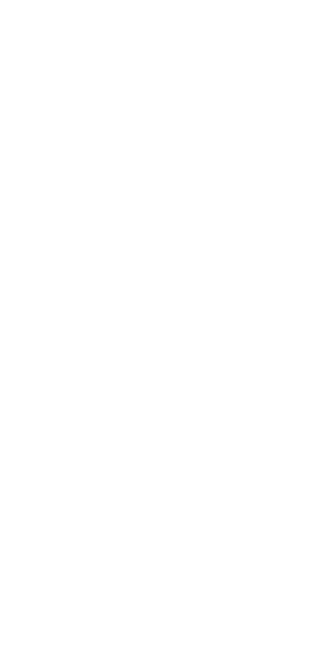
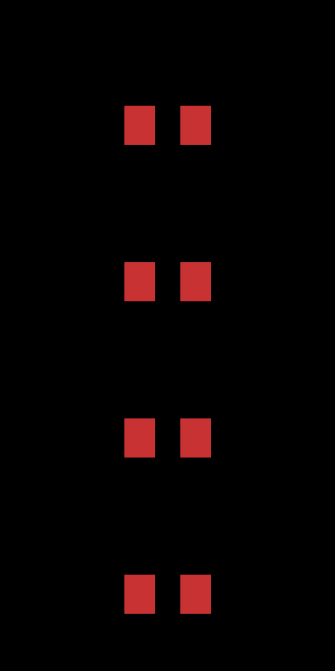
part: none -> (167, 125)
part: none -> (167, 281)
part: none -> (167, 437)
part: none -> (167, 594)

